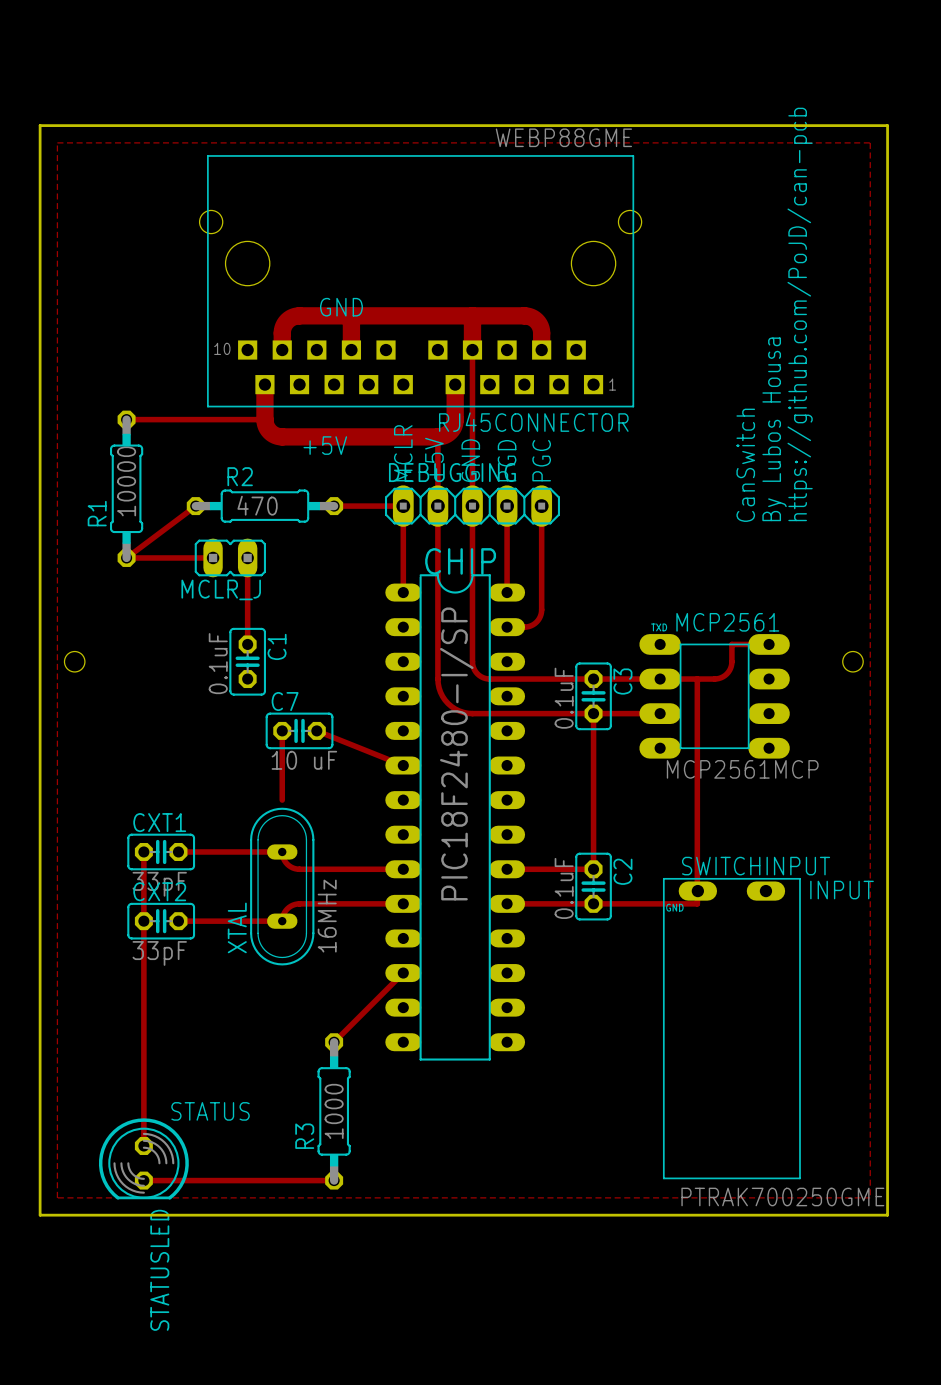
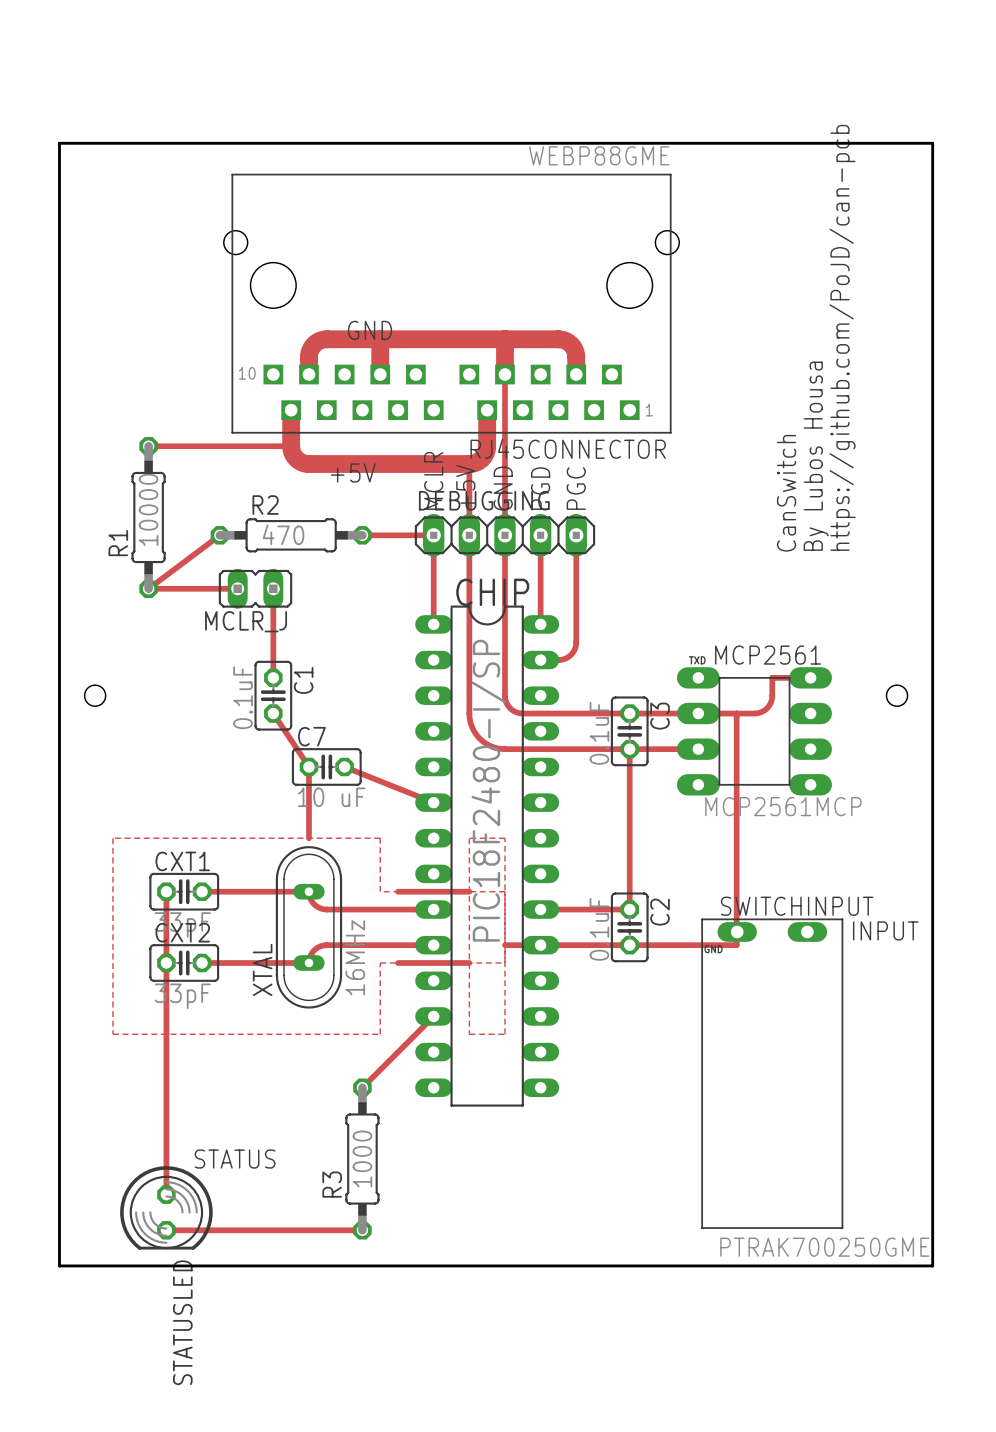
zone outline: (57, 142) (870, 142) (870, 1197) (57, 1197) (57, 142) -> none
track: none -> (273, 713) (308, 766)
zone outline: none -> (469, 838) (504, 838) (504, 1034) (469, 1034) (469, 838)
track: none -> (398, 891) (469, 891)
zone outline: none -> (504, 891) (380, 891) (380, 838) (112, 838) (112, 1034) (380, 1034) (380, 962) (504, 962)
track: none -> (504, 945) (540, 945)
track: none -> (398, 962) (469, 962)

